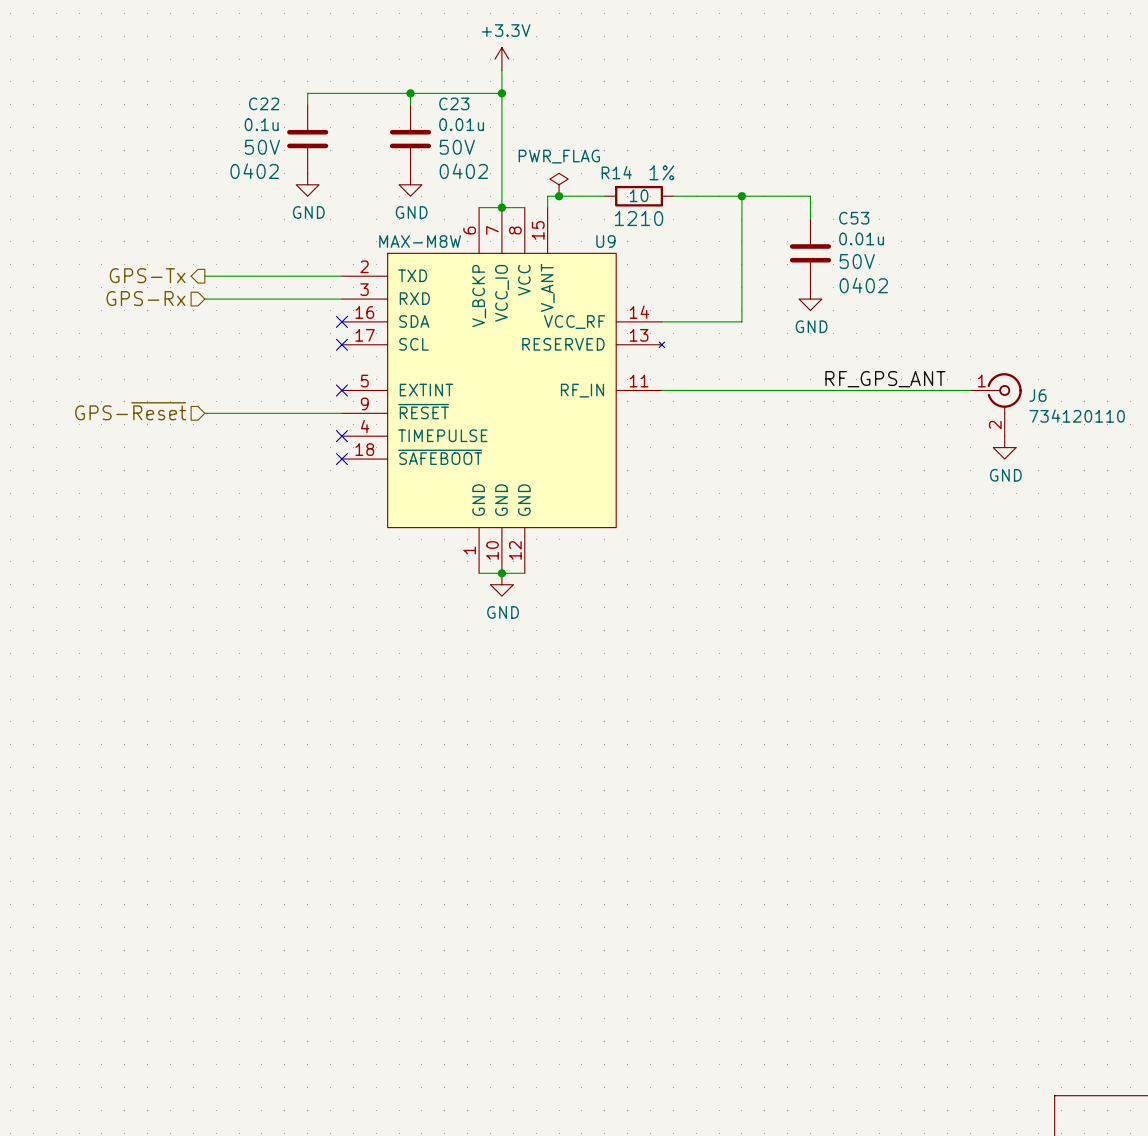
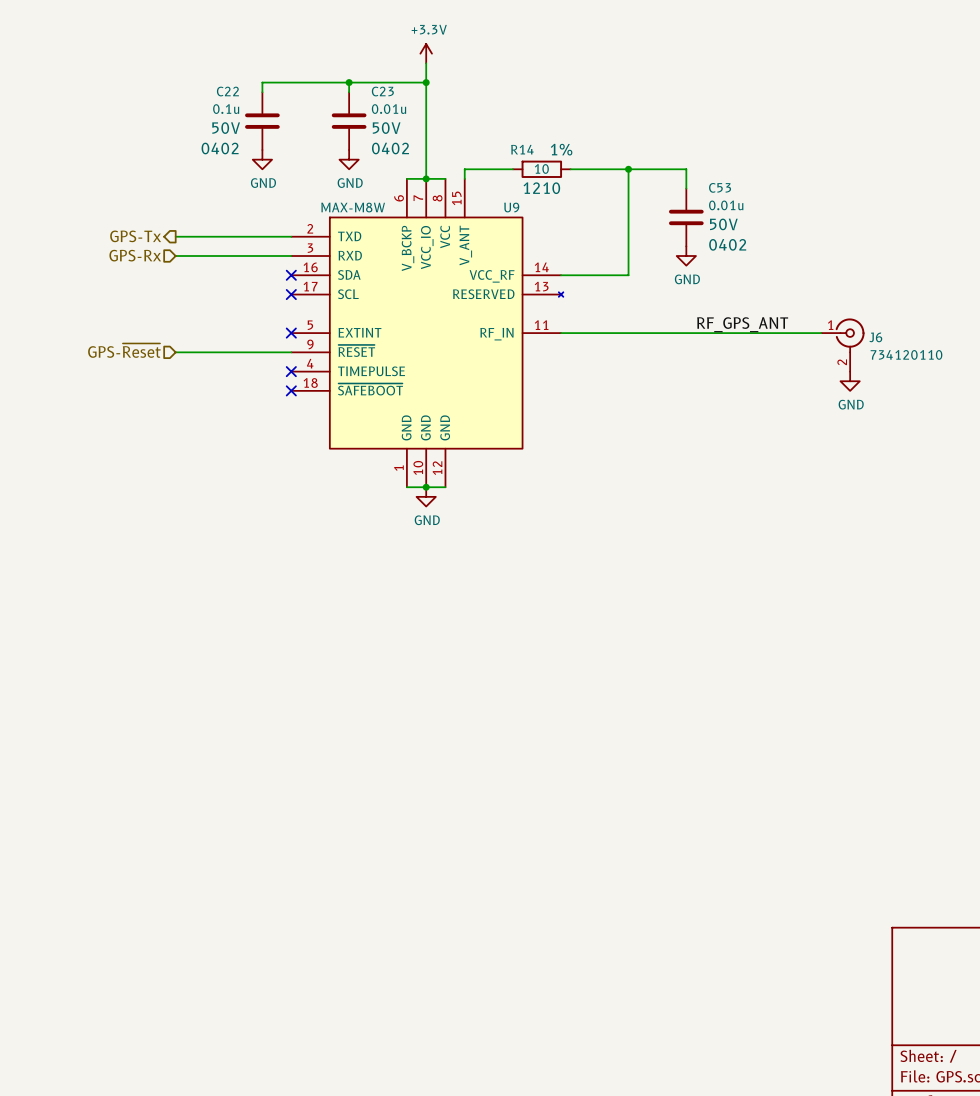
power symbol: PWR_FLAG (559, 184) -> none
junction: (559, 196) -> none

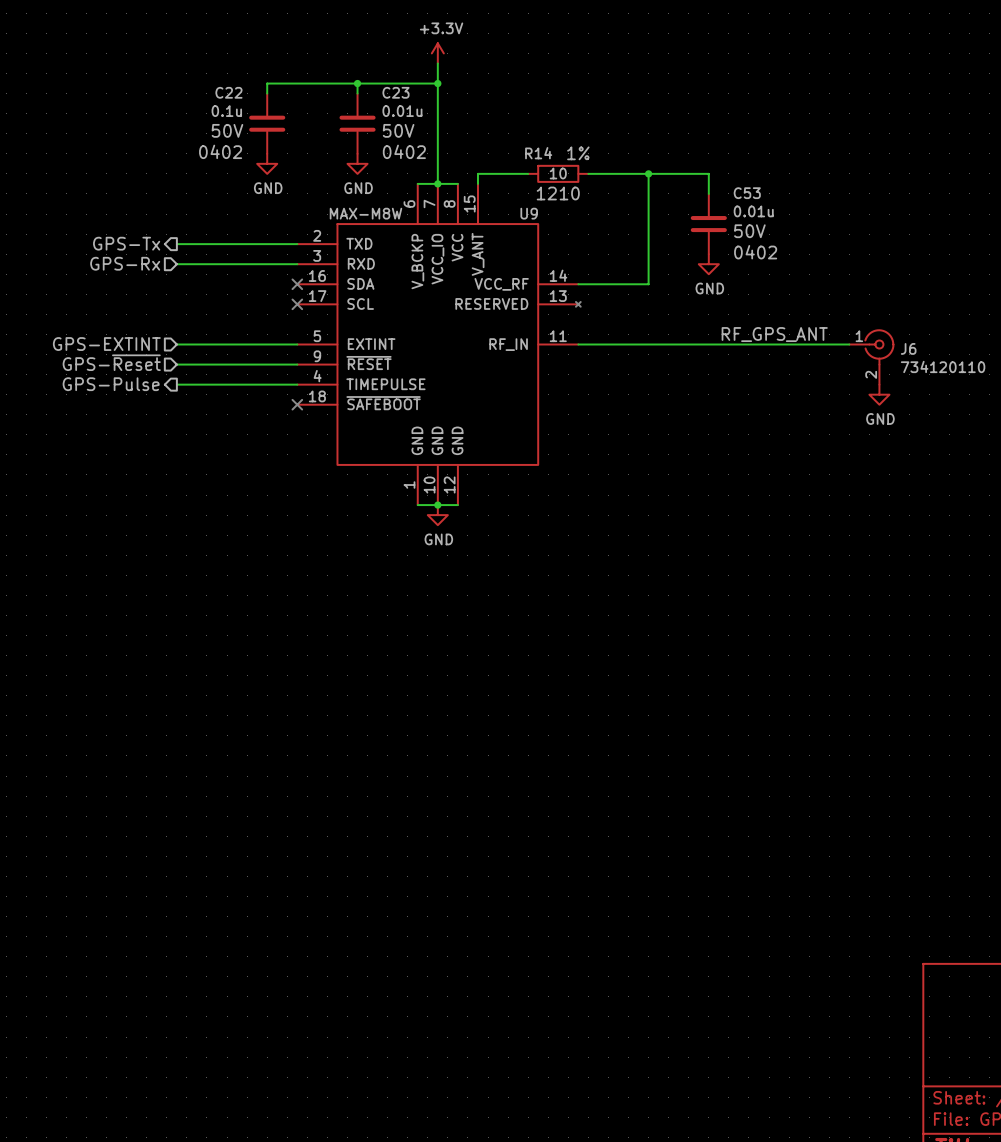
hierarchical label: none -> GPS-EXTINT (106, 344)
wire: none -> (176, 344) (297, 344)
no-connect mark: (291, 333) -> none
hierarchical label: none -> GPS-Pulse (111, 384)
wire: none -> (176, 384) (297, 384)
no-connect mark: (291, 371) -> none

